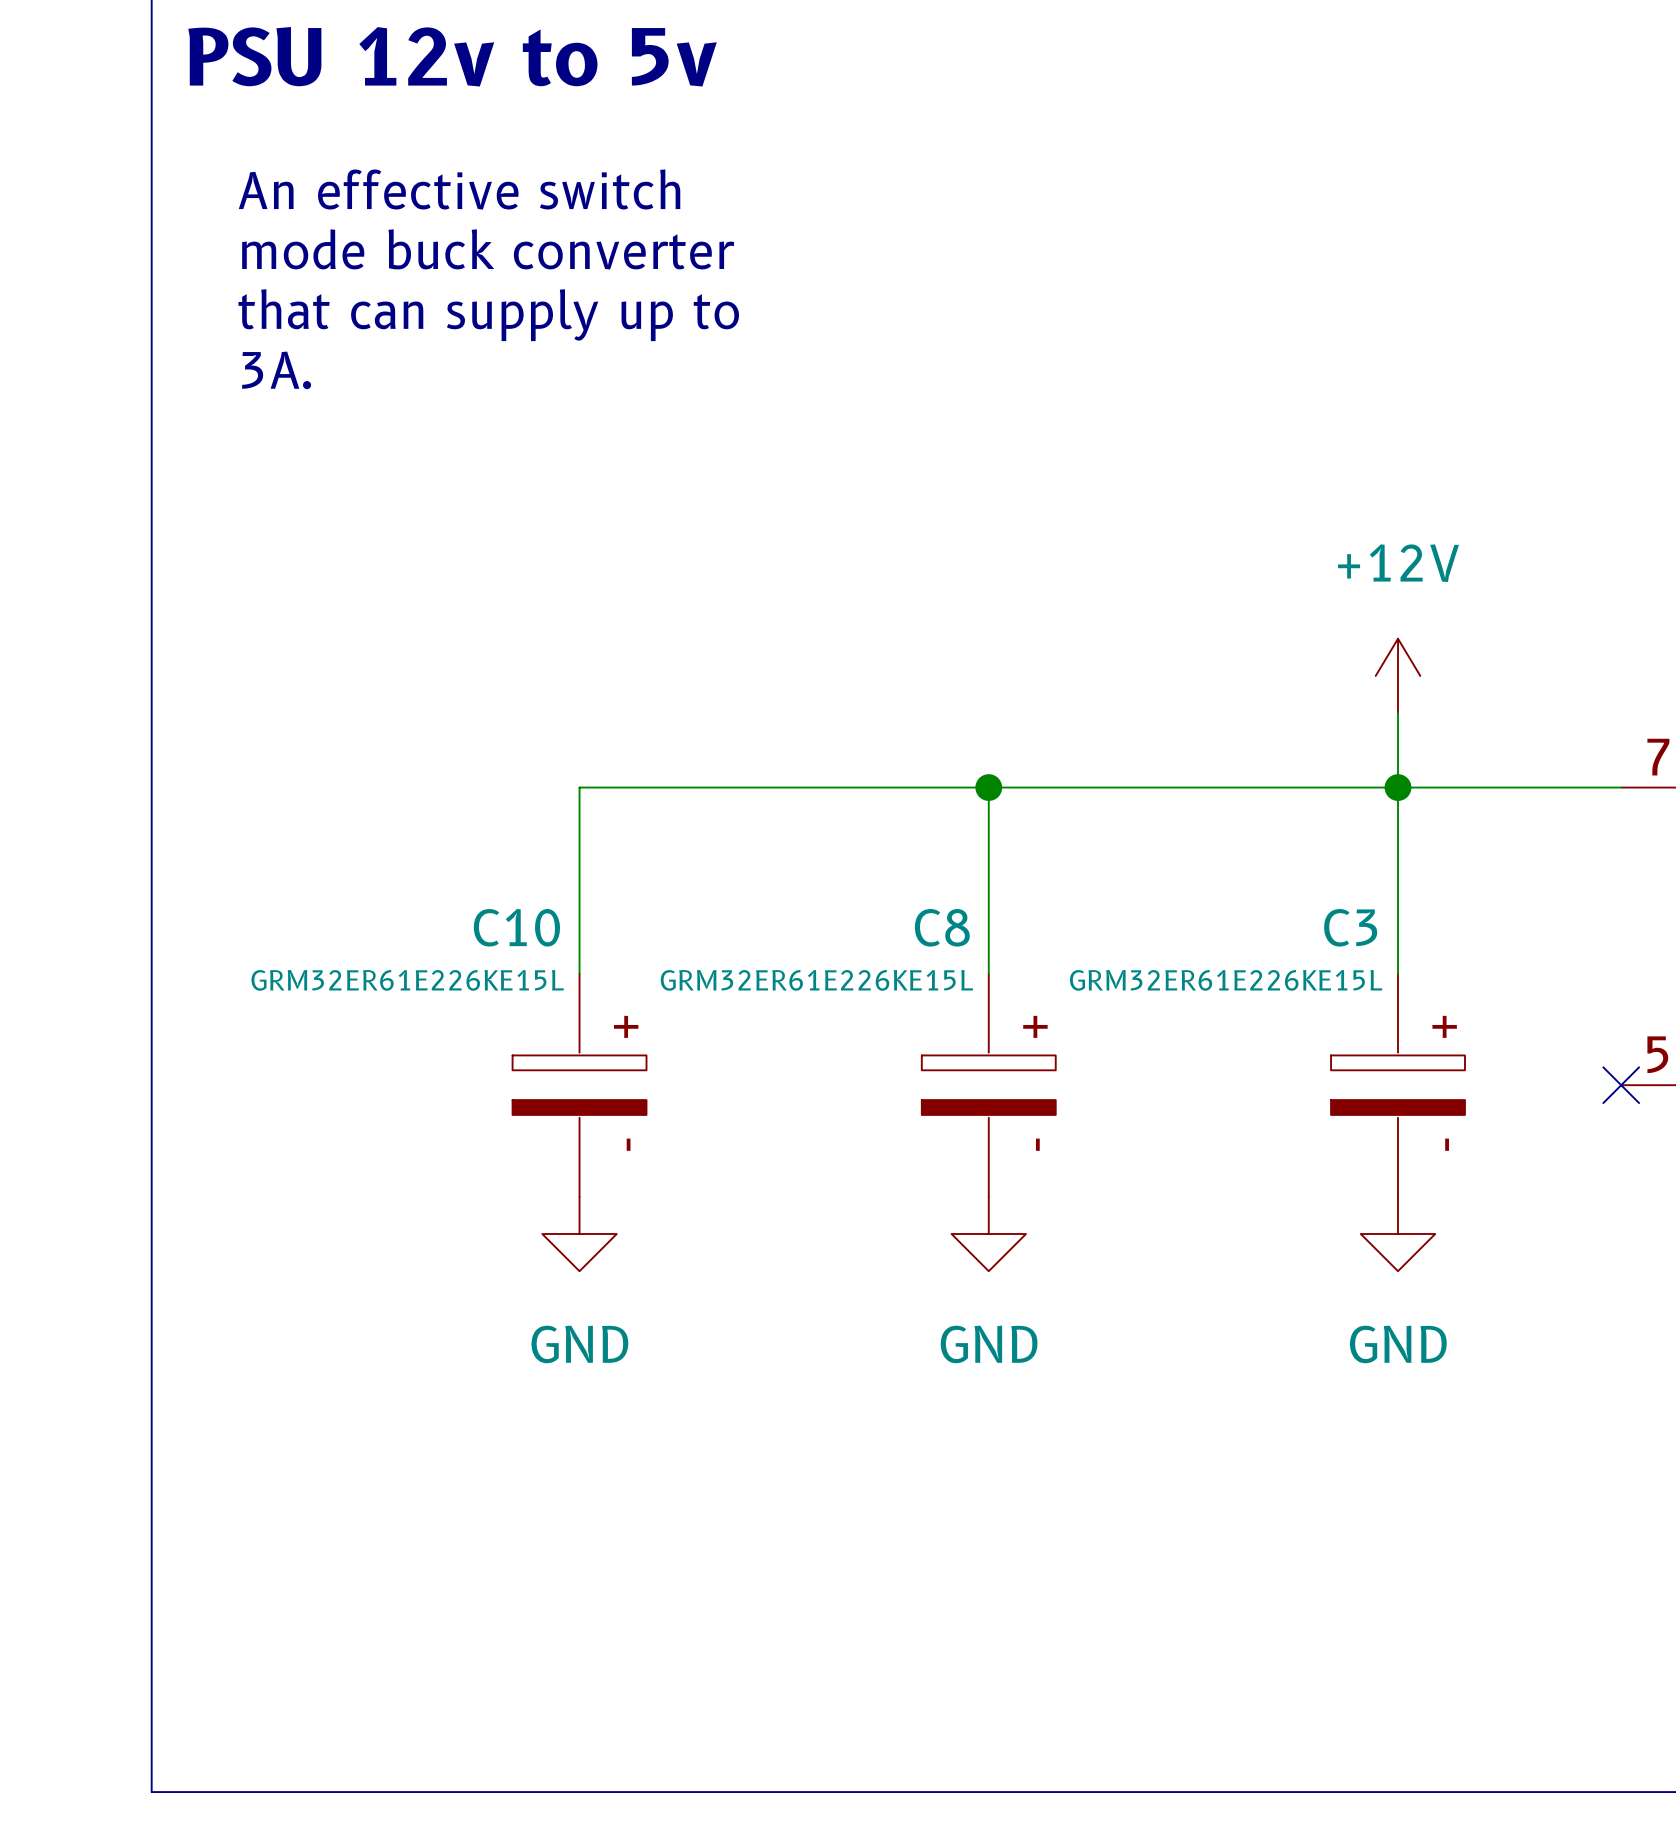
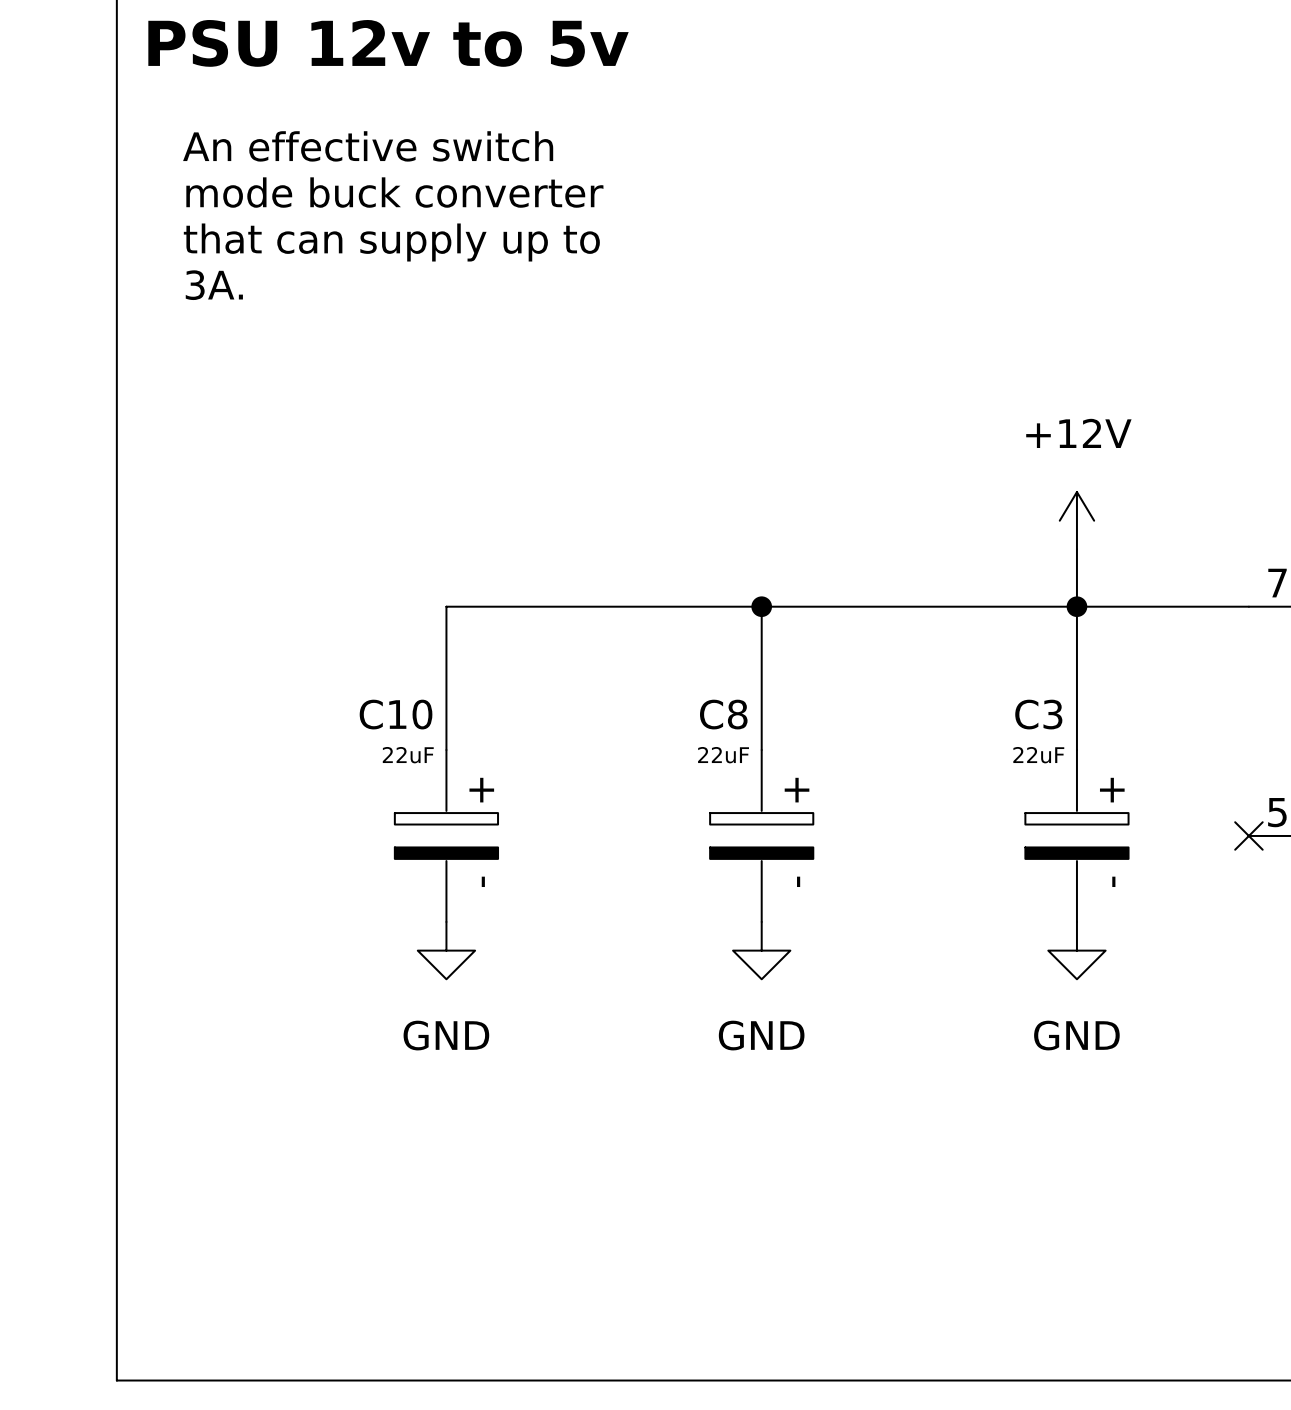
C10 value: GRM32ER61E226KE15L (407, 980) -> 22uF (408, 755)
C8 value: GRM32ER61E226KE15L (816, 980) -> 22uF (723, 755)
C3 value: GRM32ER61E226KE15L (1226, 980) -> 22uF (1038, 755)

